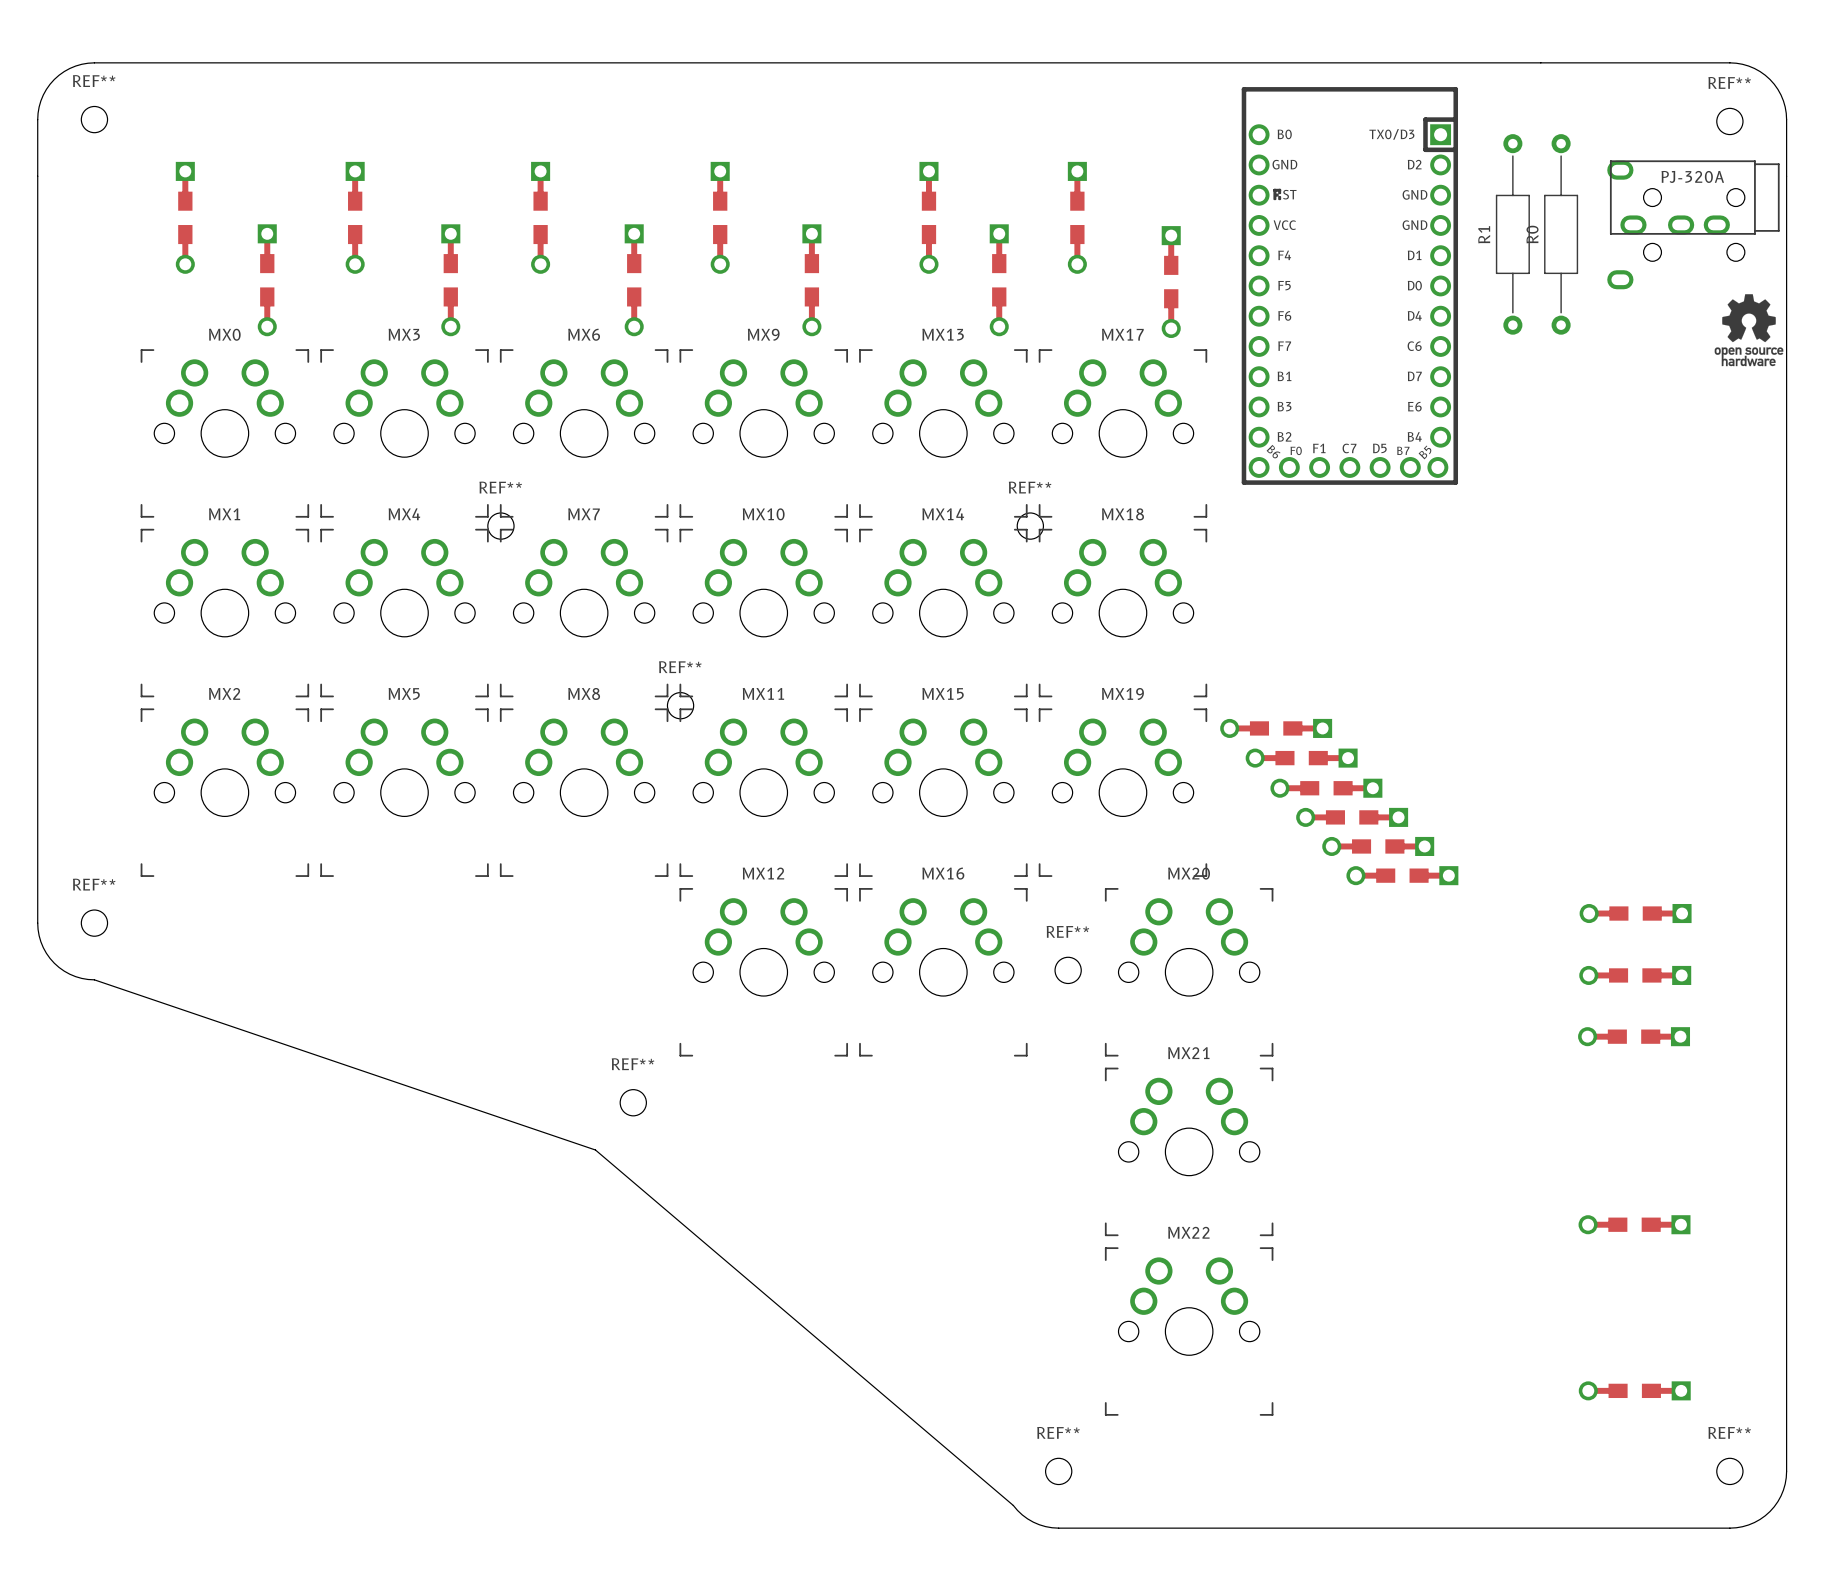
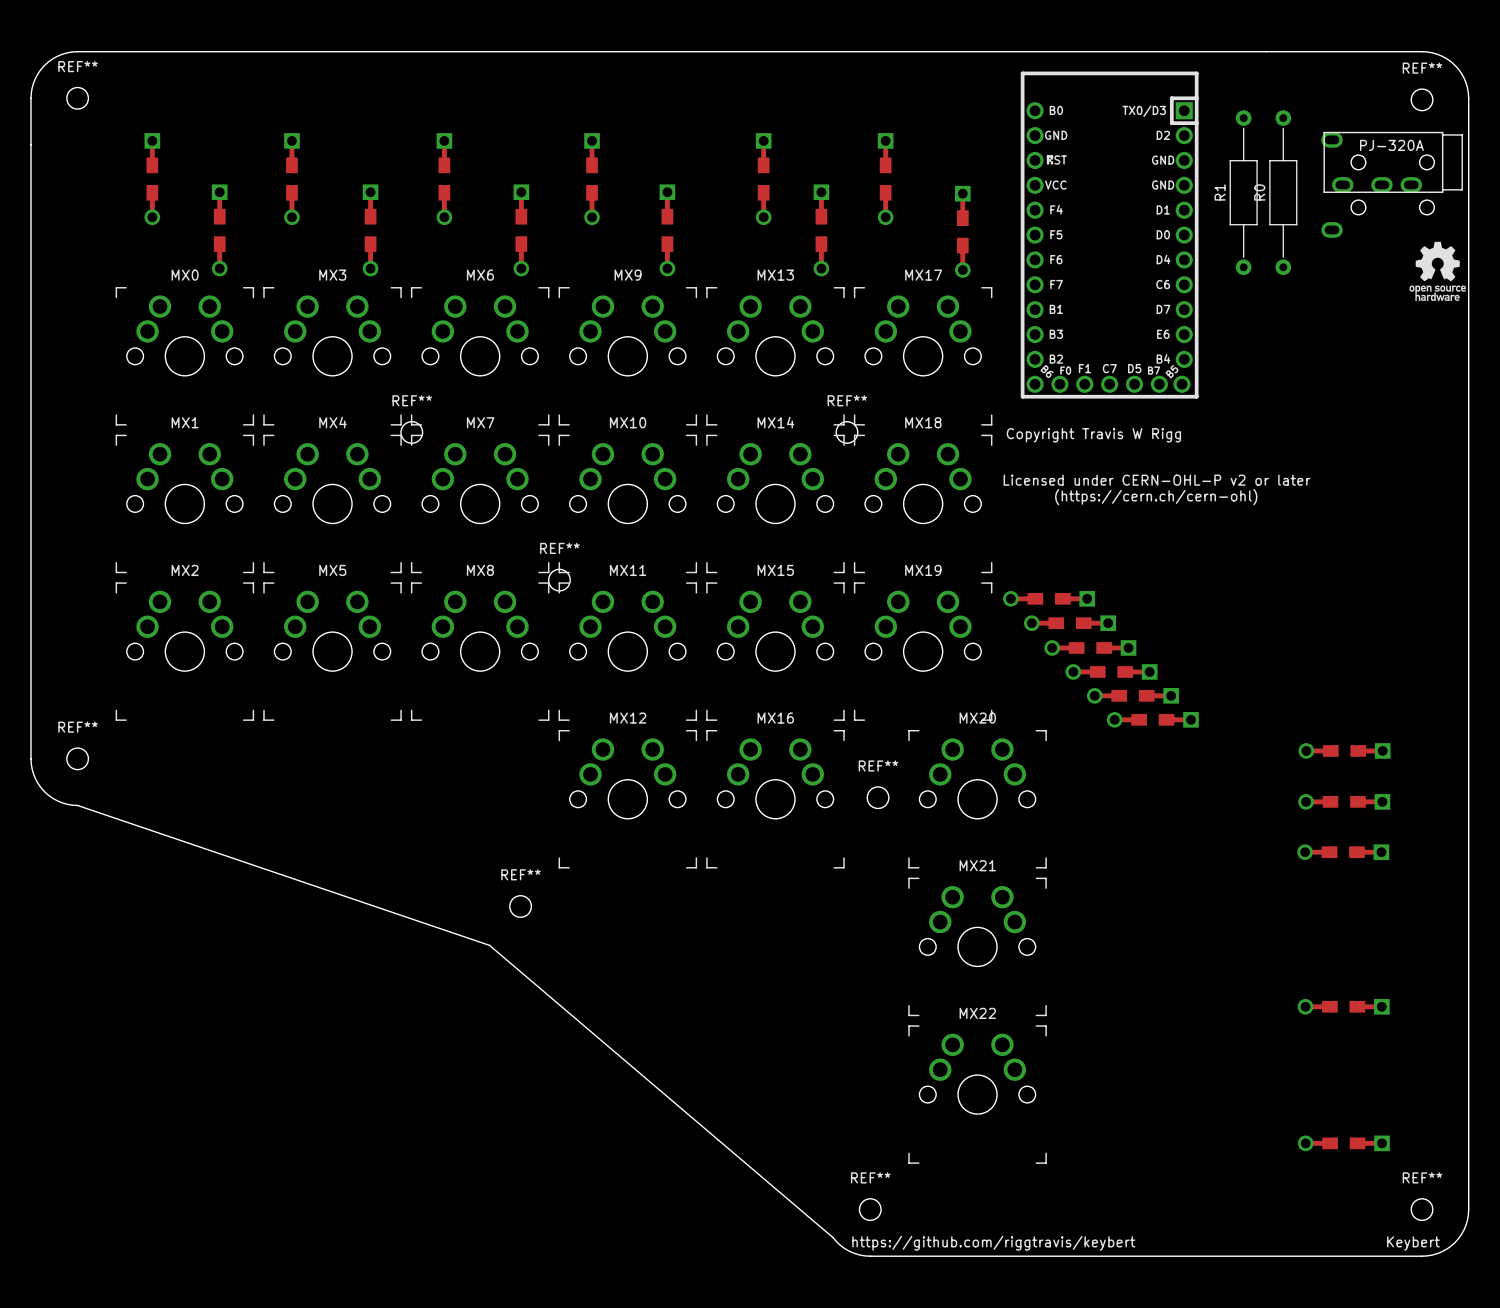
text: none -> Copyright Travis W Rigg (1093, 435)
text: none -> Licensed under CERN-OHL-P v2 or later (1156, 480)
text: none -> (https://cern.ch/cern-ohl) (1156, 497)
text: none -> https://github.com/riggtravis/keybert (993, 1243)
text: none -> Keybert (1413, 1243)

